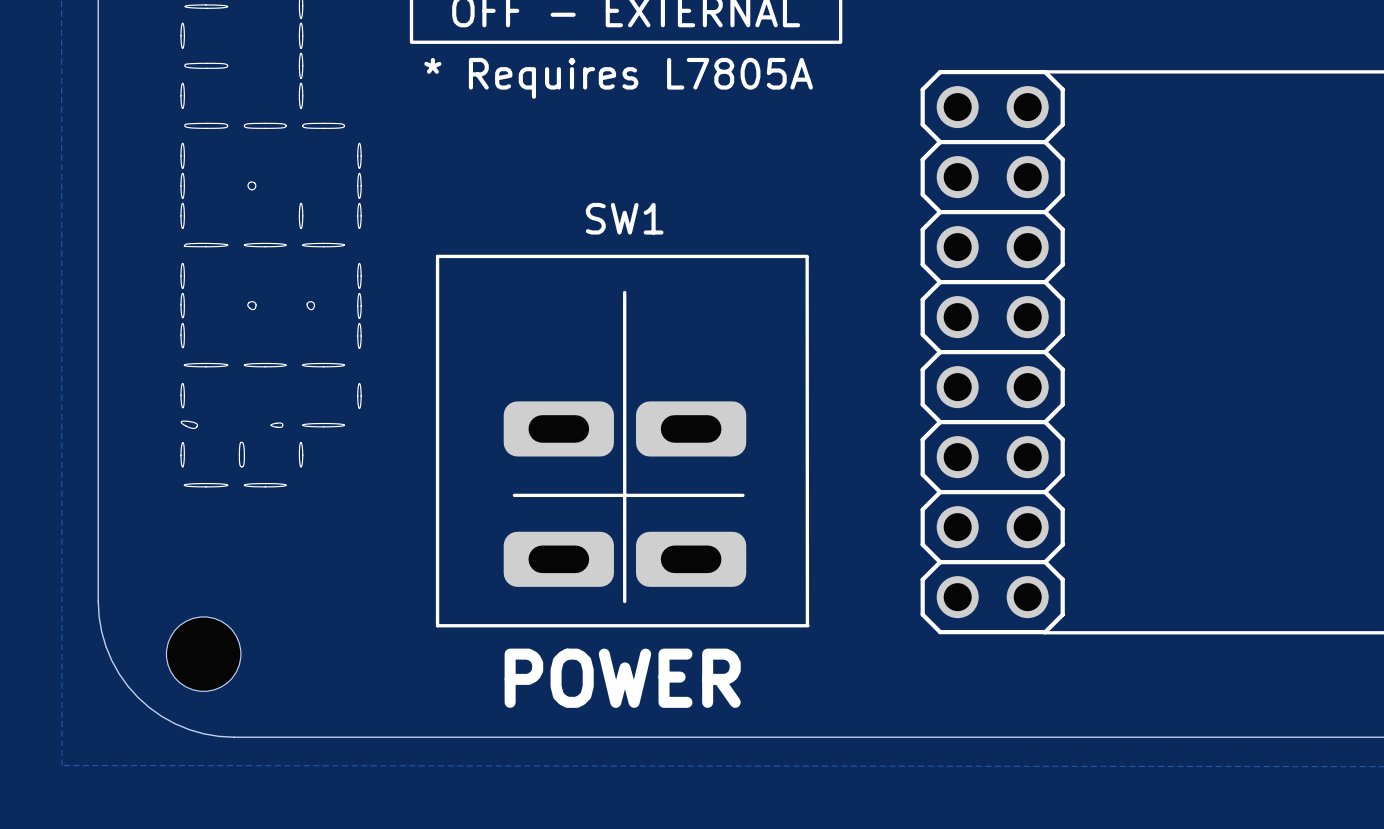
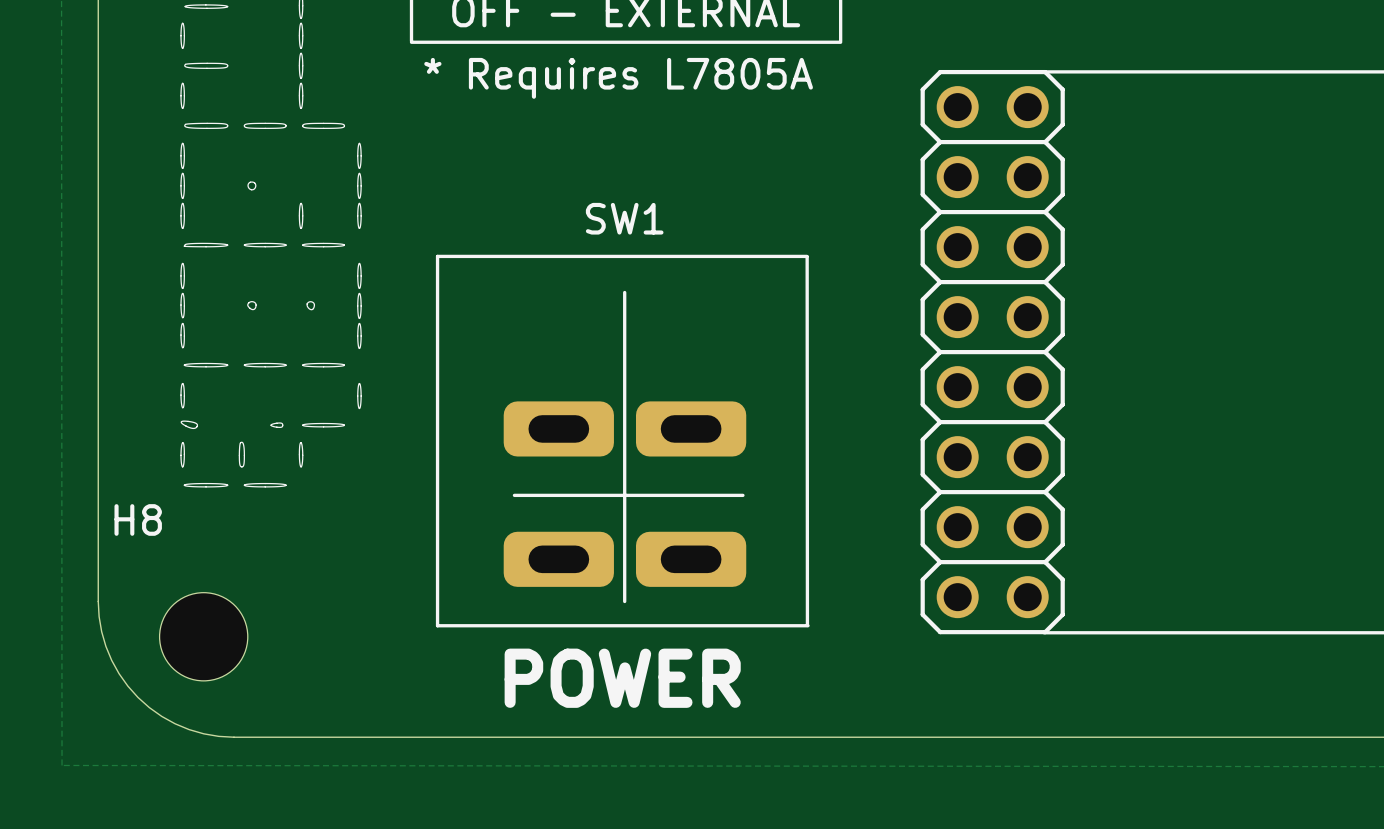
H8: none -> (203, 636)
part: (203, 654) -> none

